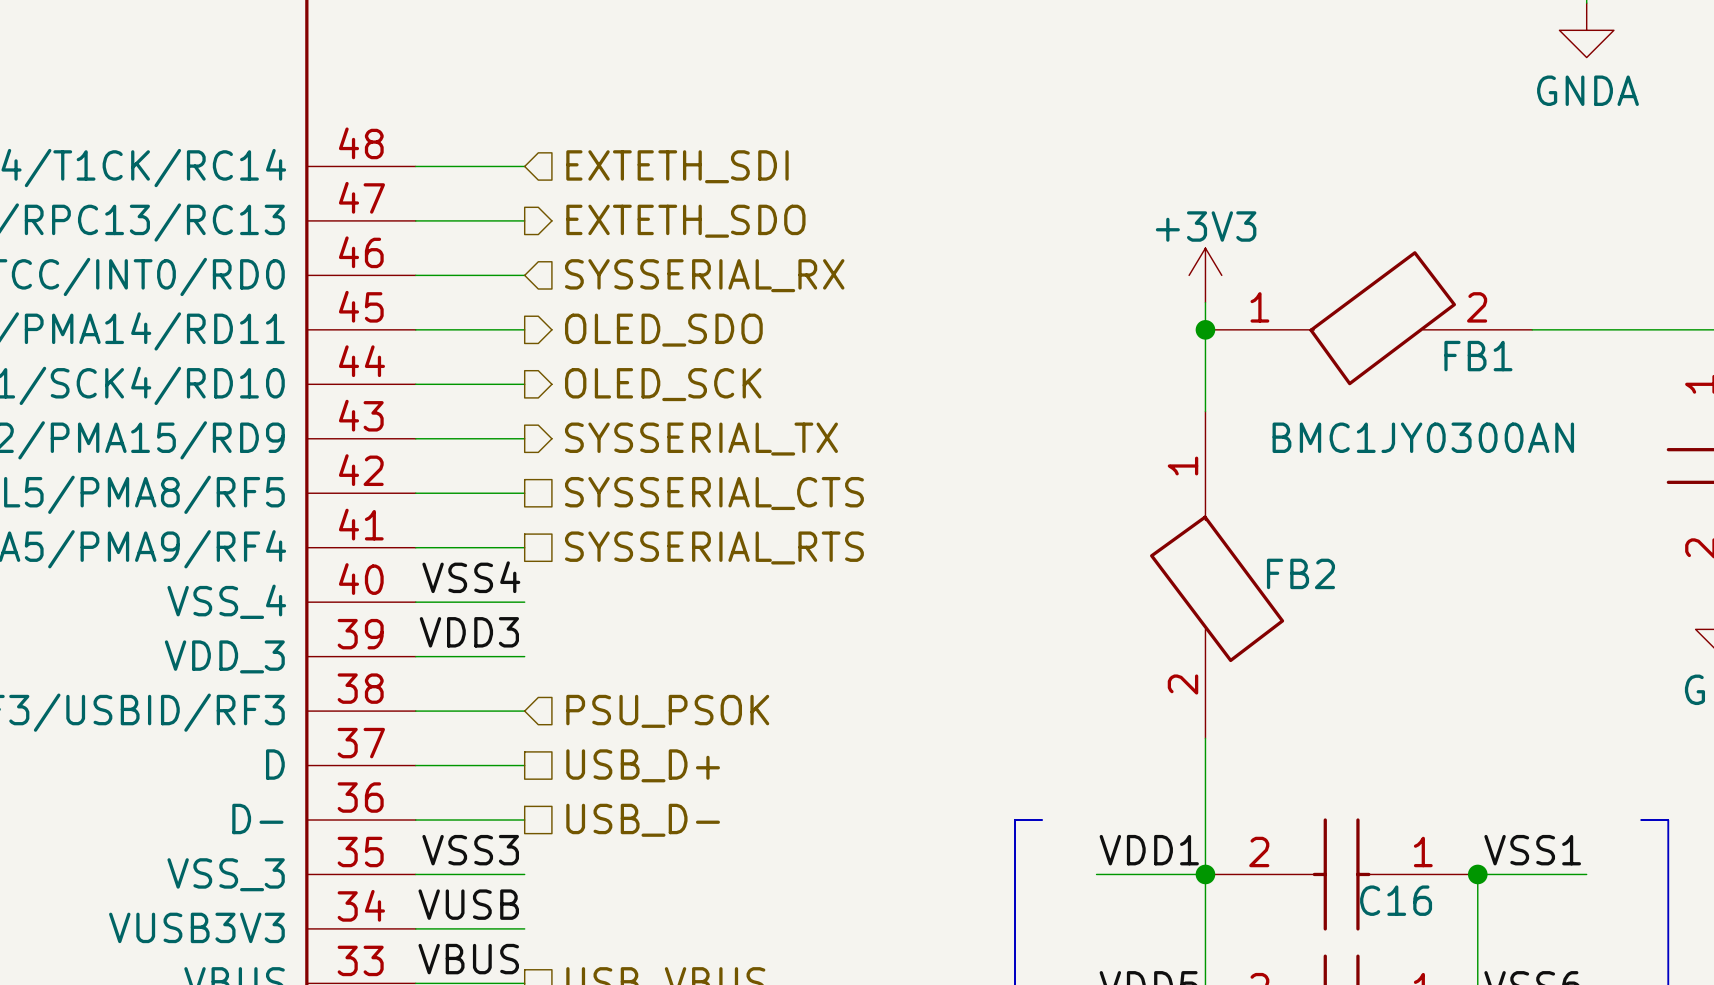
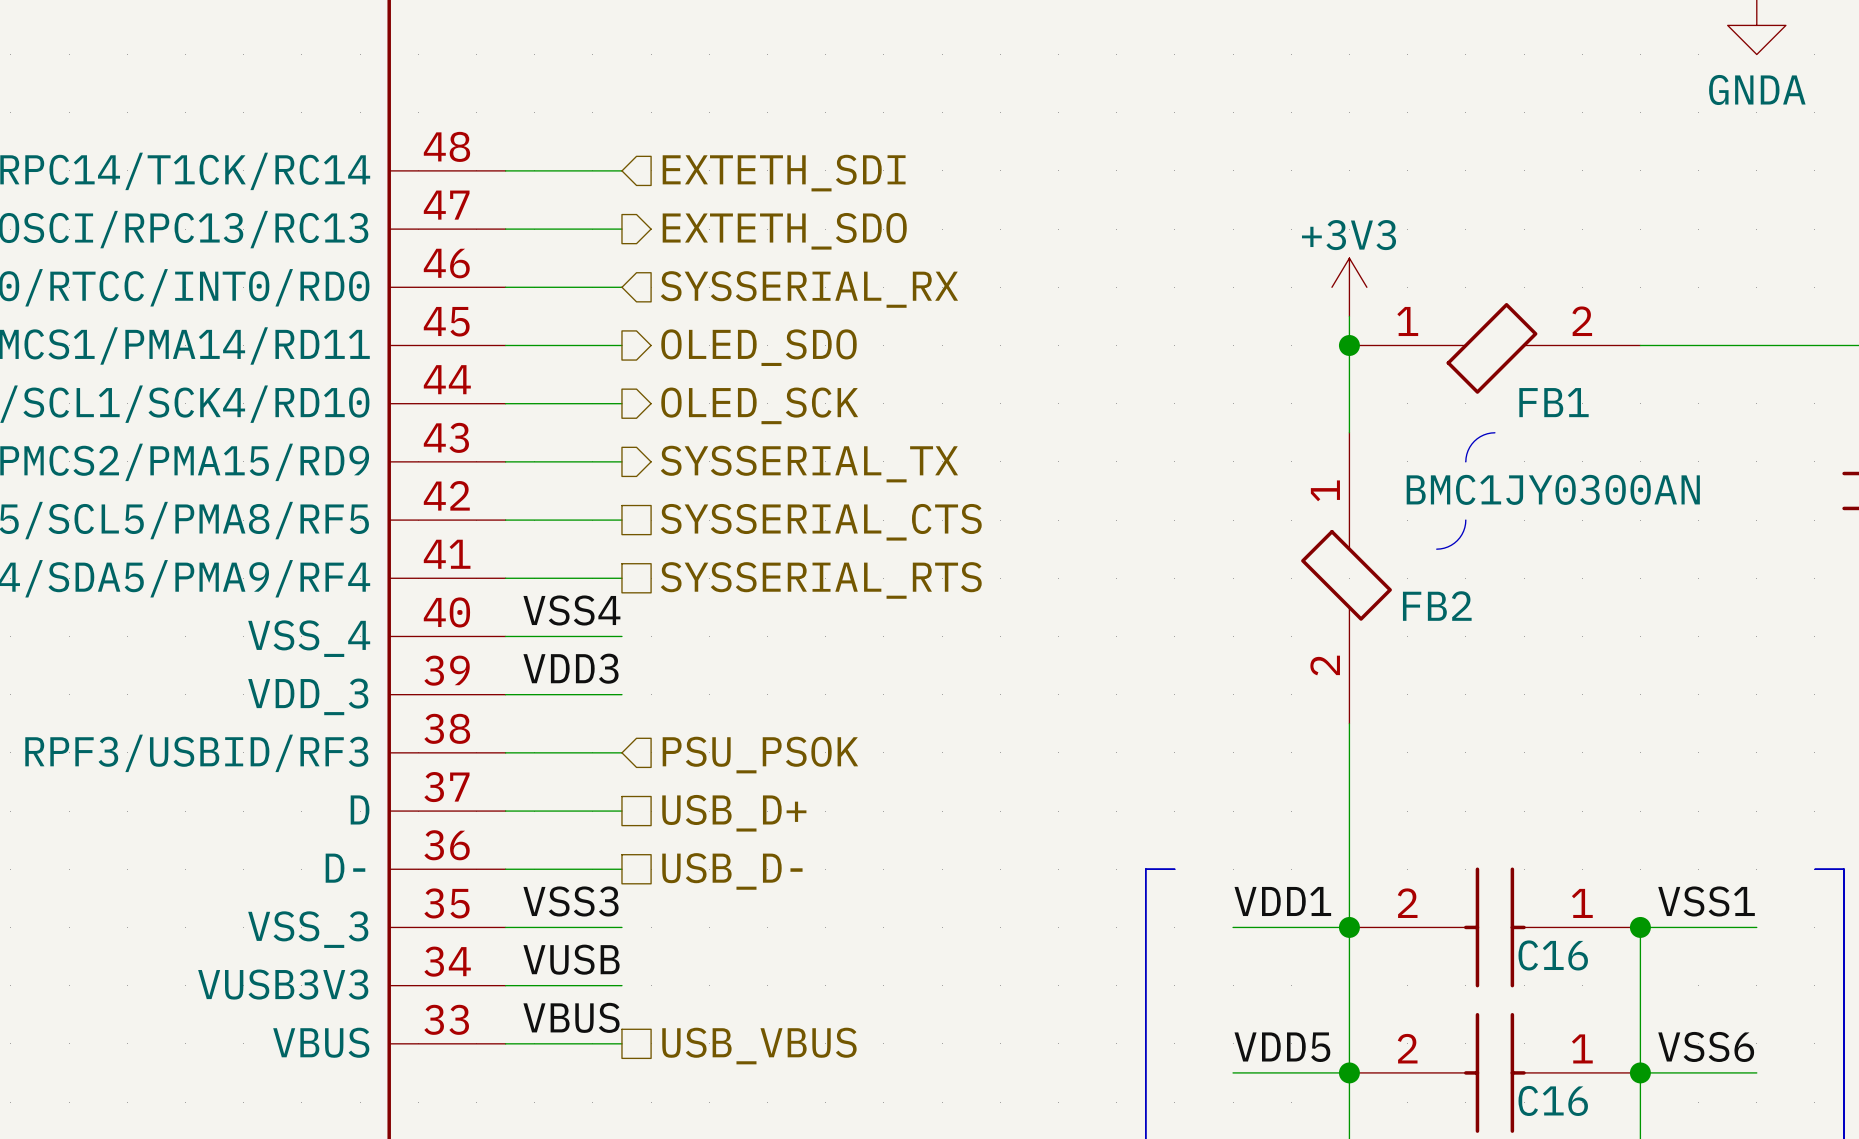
FB1 symbol: [1205, 251, 1533, 386] -> [1349, 303, 1641, 394]
FB1 name position: FB1 (1478, 356) -> FB1 (1554, 402)
FB2 symbol: [1150, 411, 1285, 739] -> [1301, 432, 1392, 724]
line: none -> (1494, 432) (1483, 435) (1474, 441) (1468, 450) (1465, 461)
line: none -> (1465, 520) (1463, 531) (1457, 540) (1447, 546) (1436, 549)

